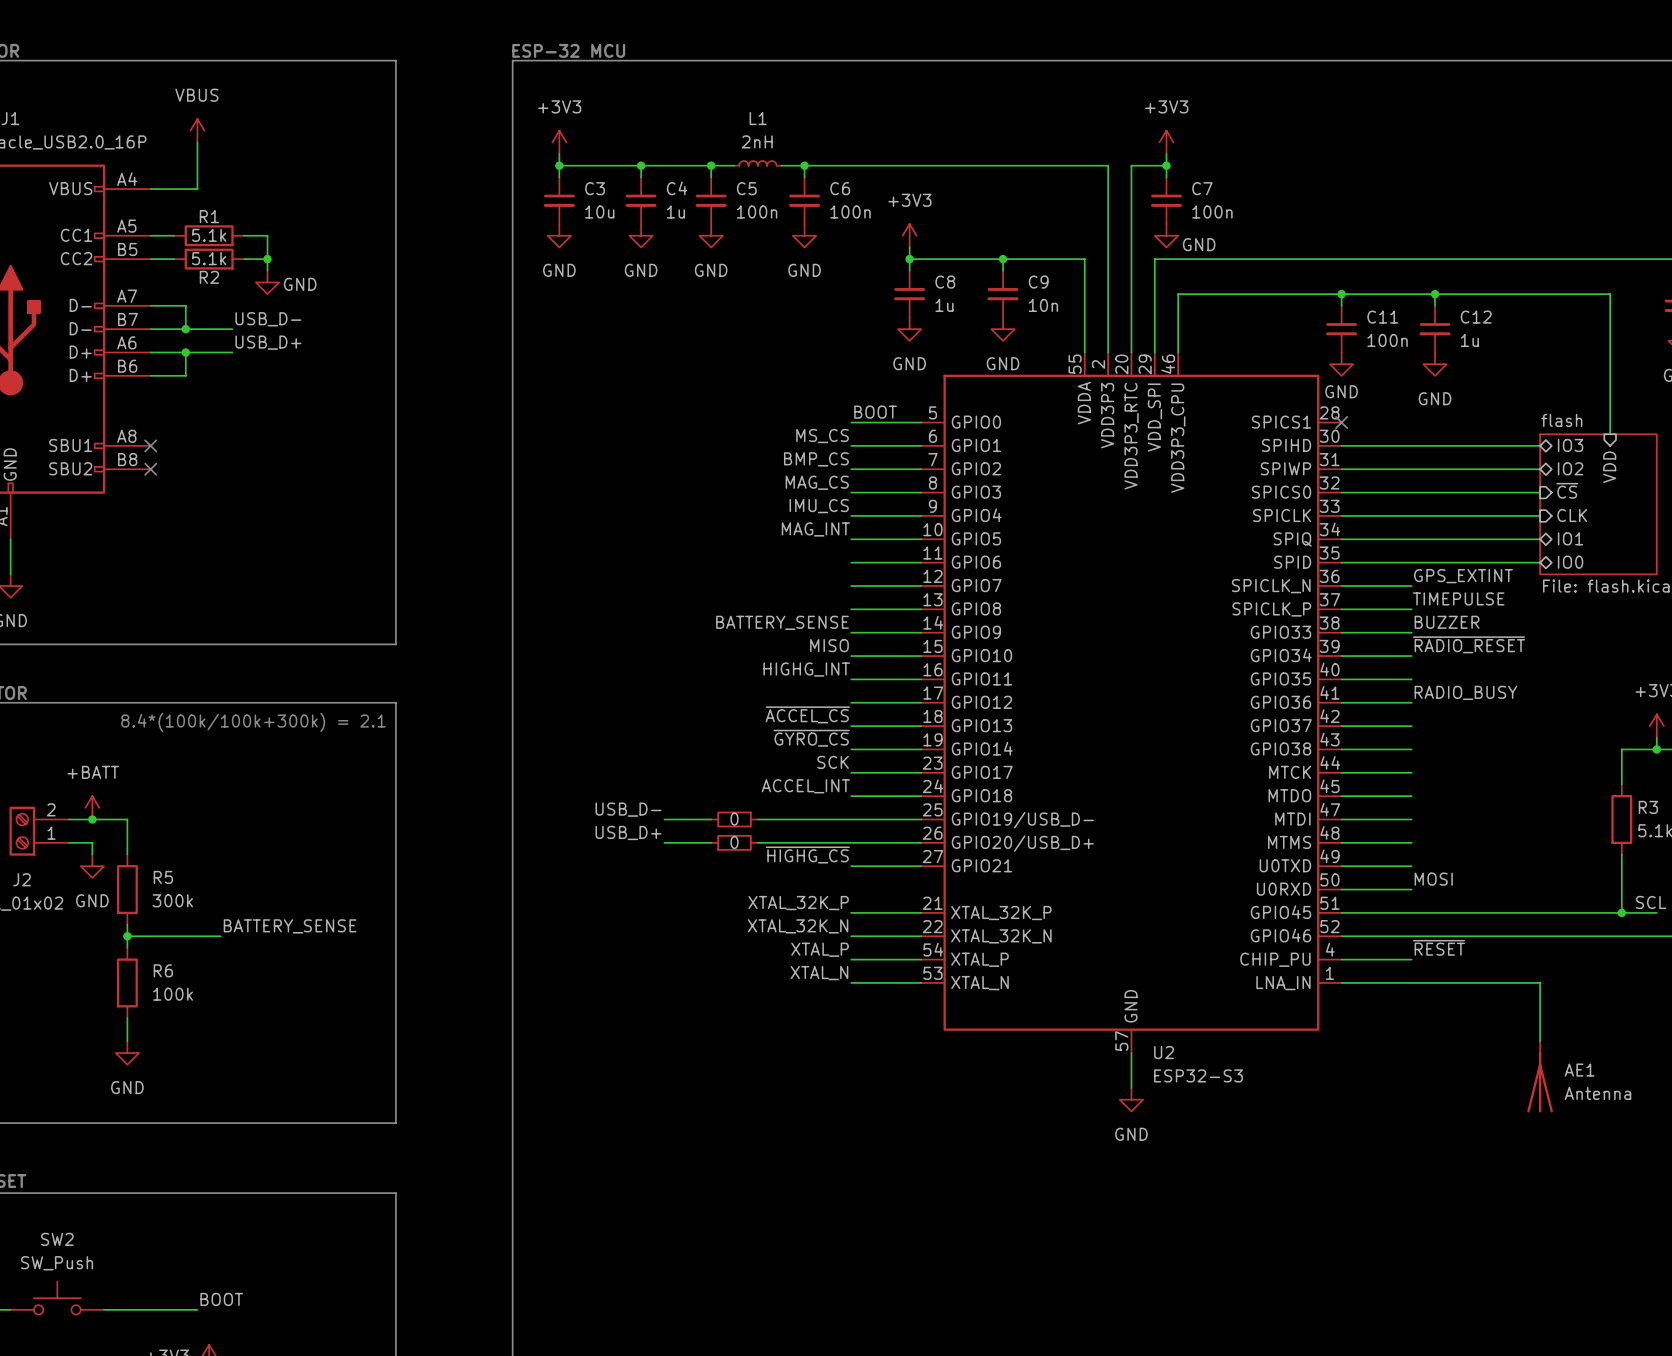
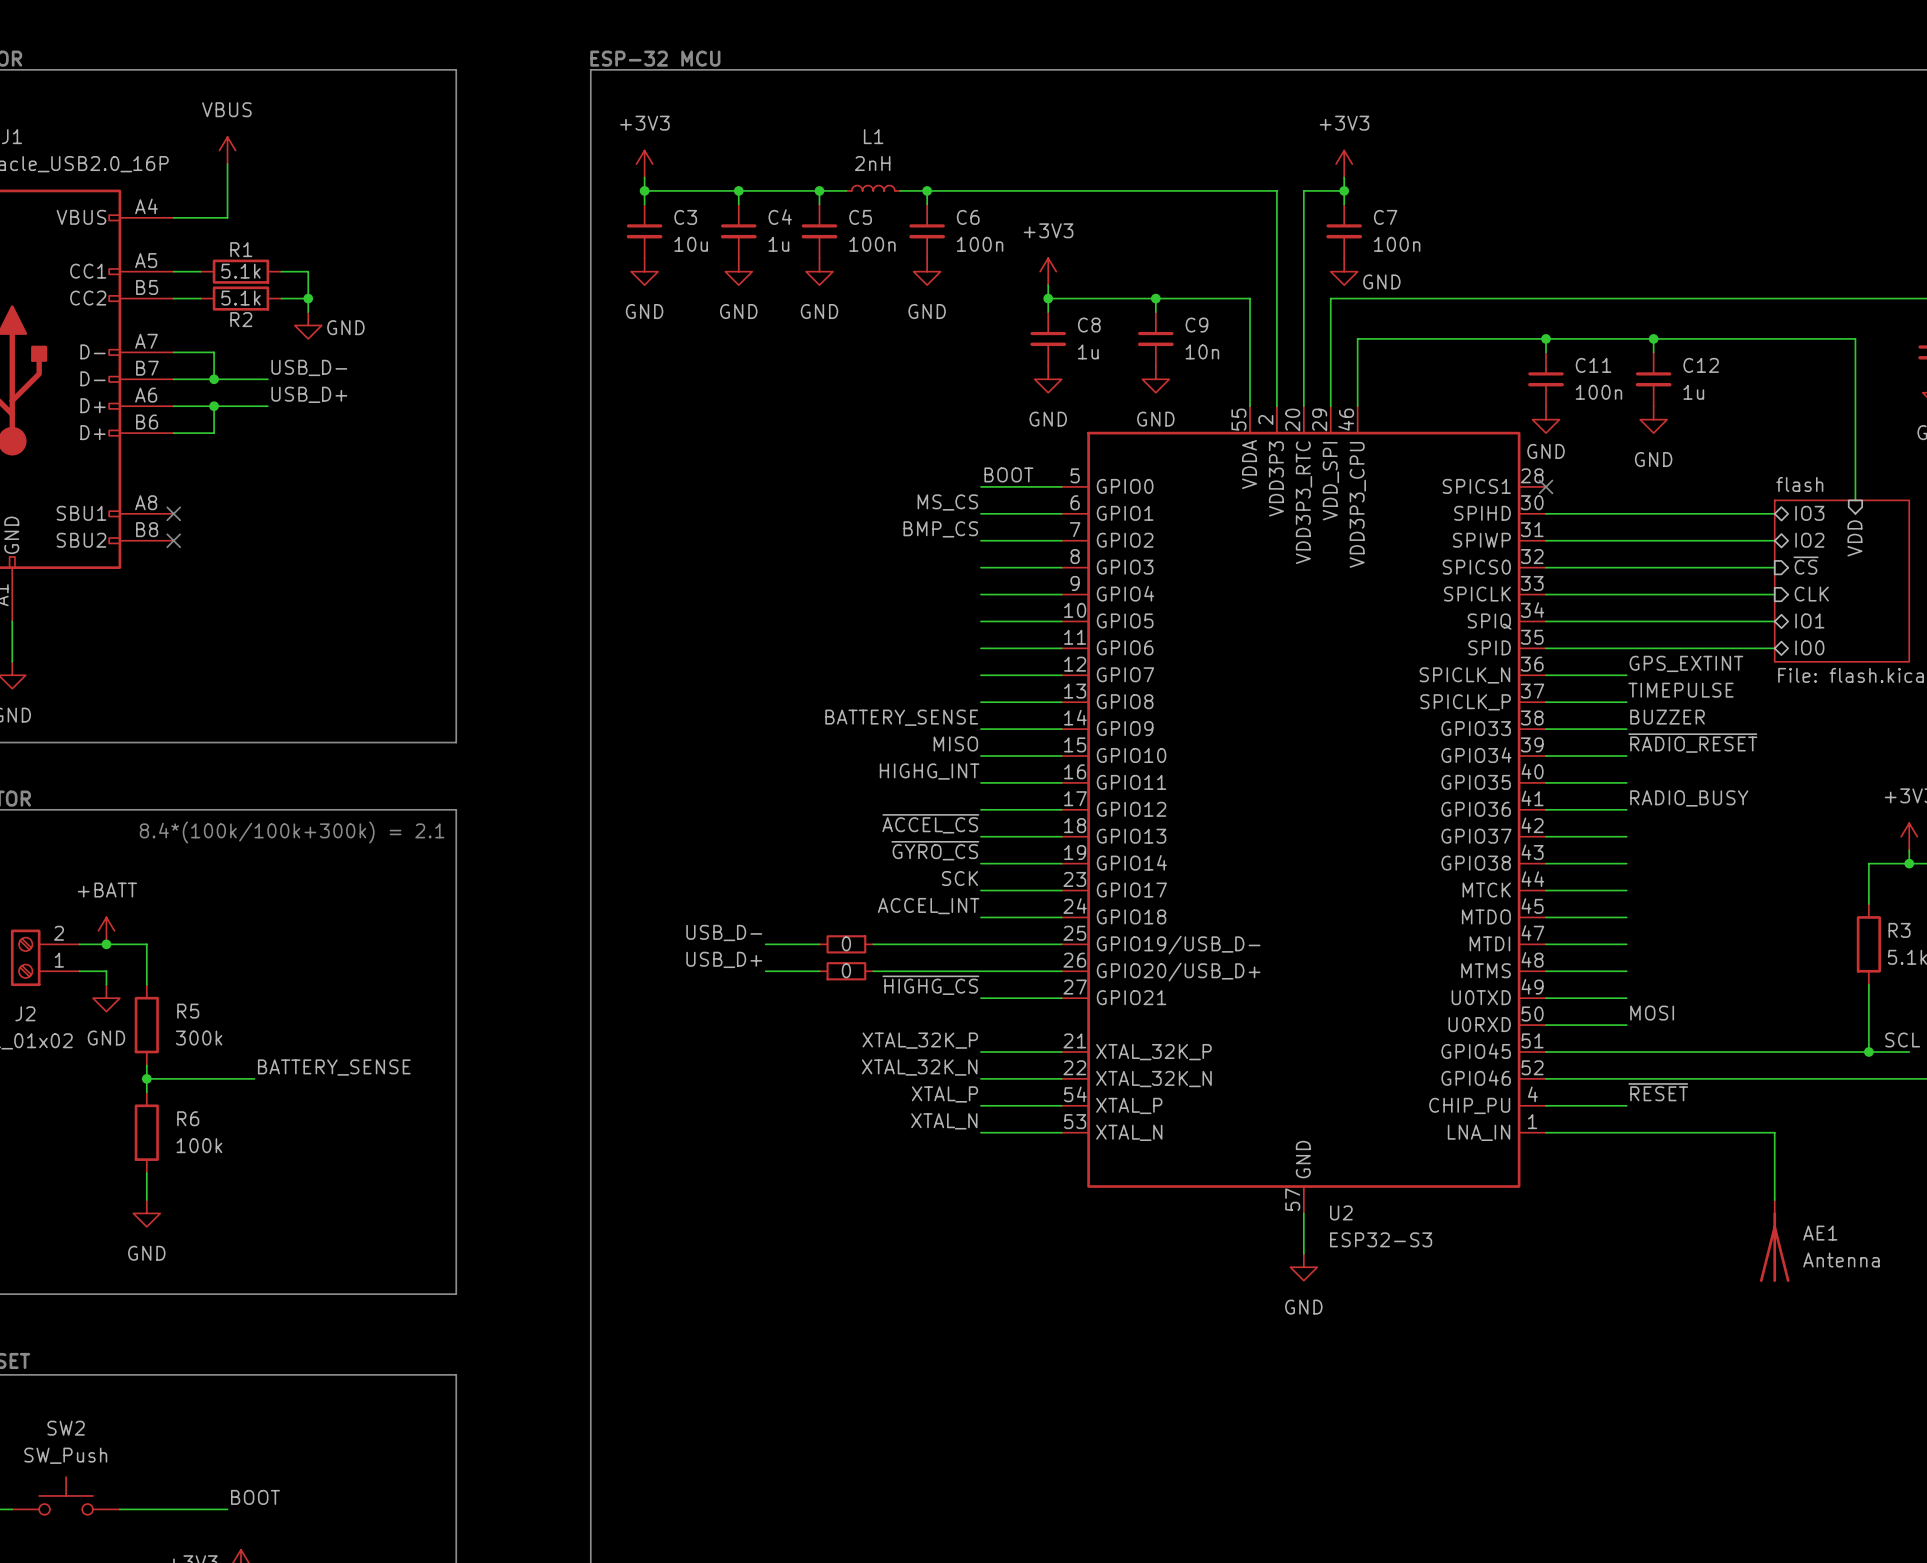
label: MAG_CS (817, 482) -> none
label: IMU_CS (819, 506) -> none
label: MAG_INT (815, 529) -> none

